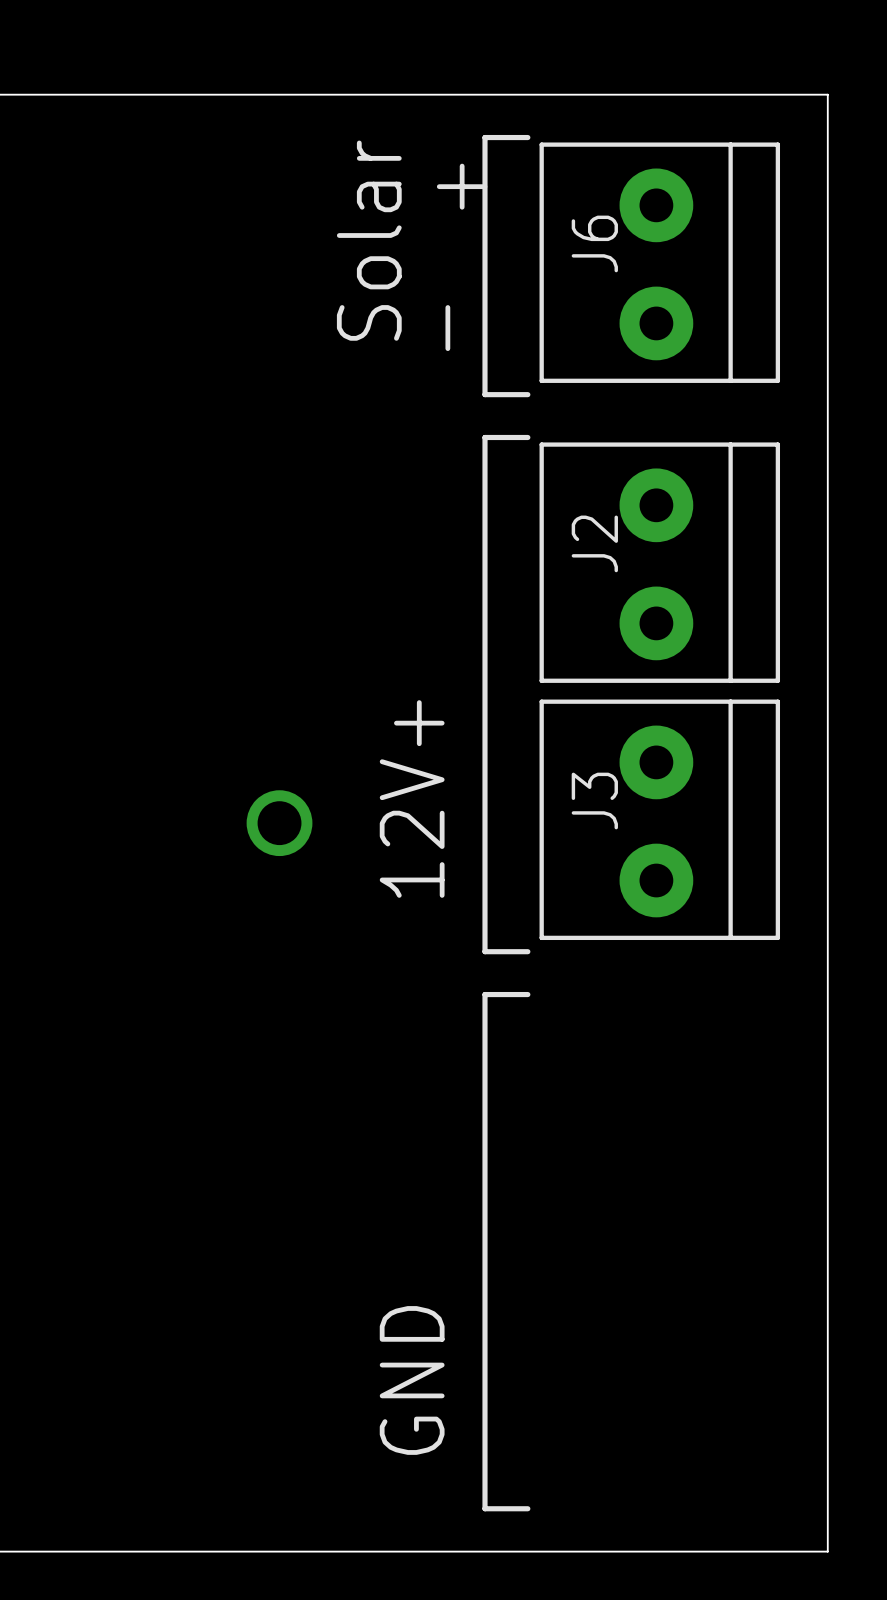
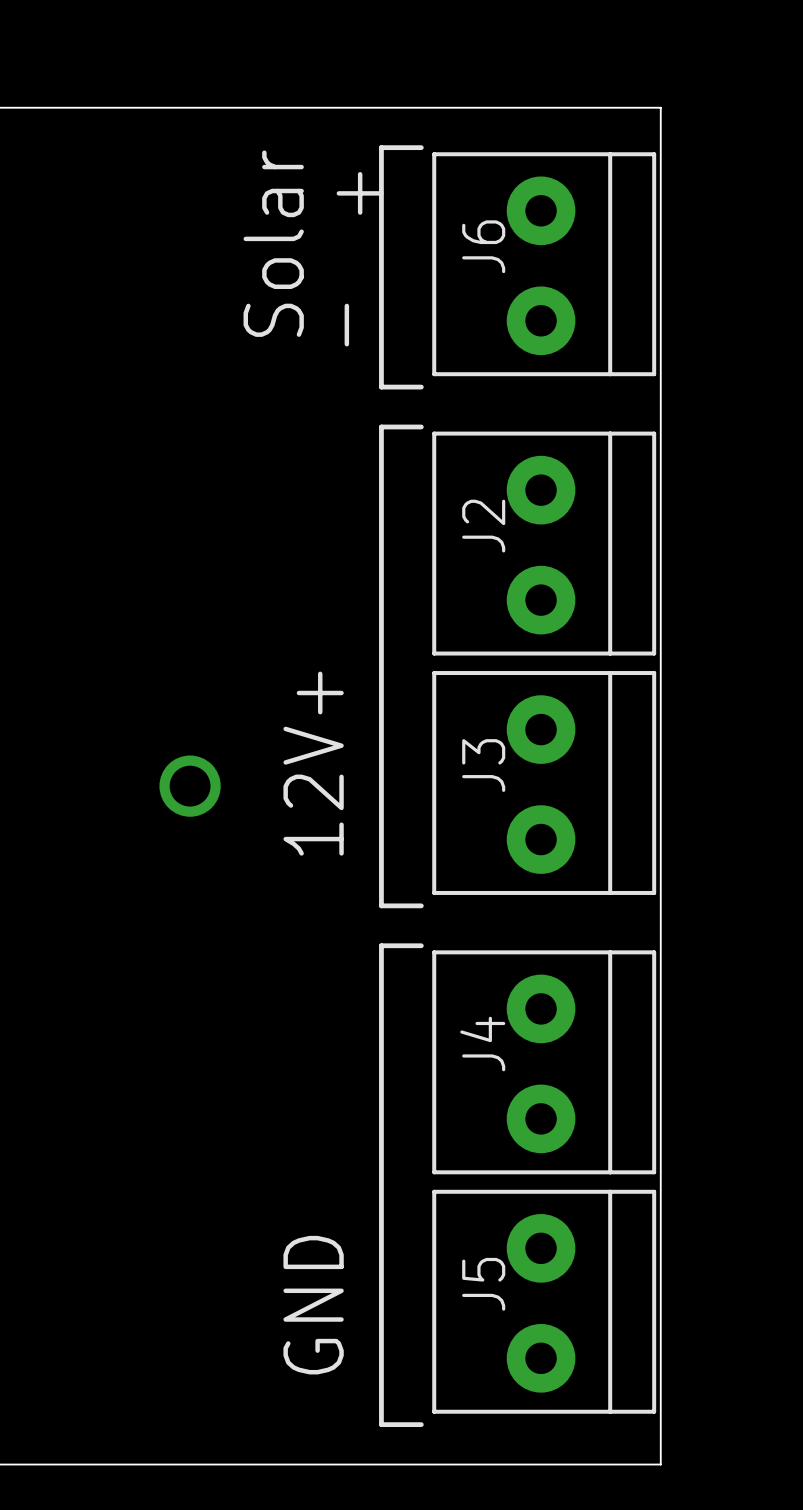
board edge: (784, 94) (827, 94) (827, 1551) (784, 1551) -> (660, 107) (660, 1464)
J4: none -> (544, 1062)
J5: none -> (544, 1301)

